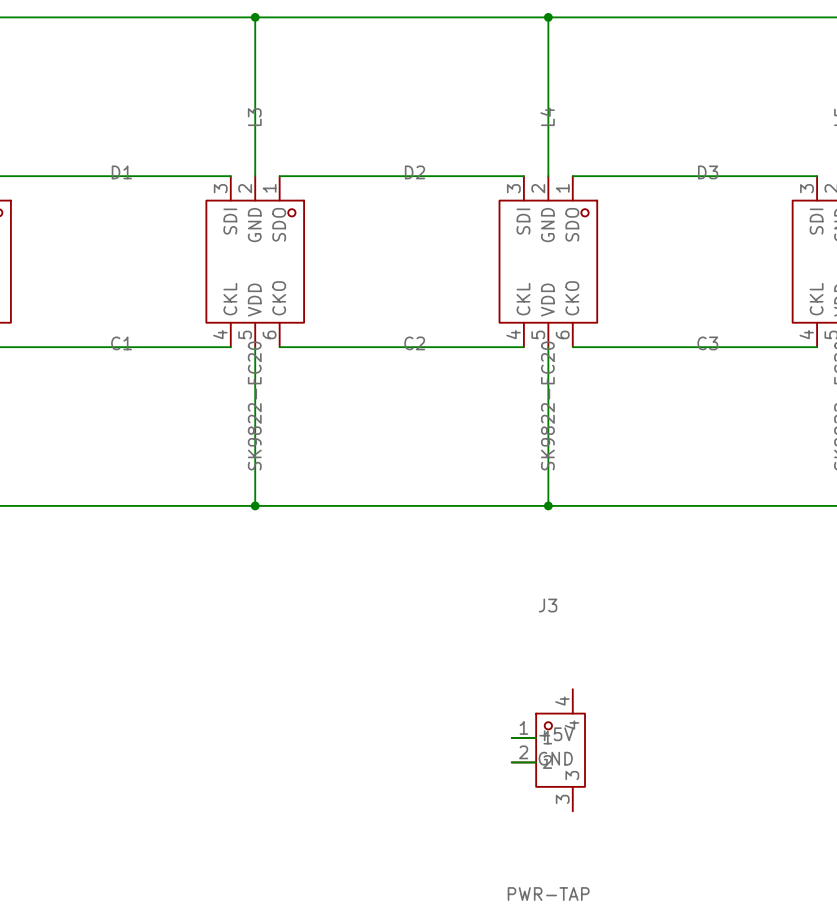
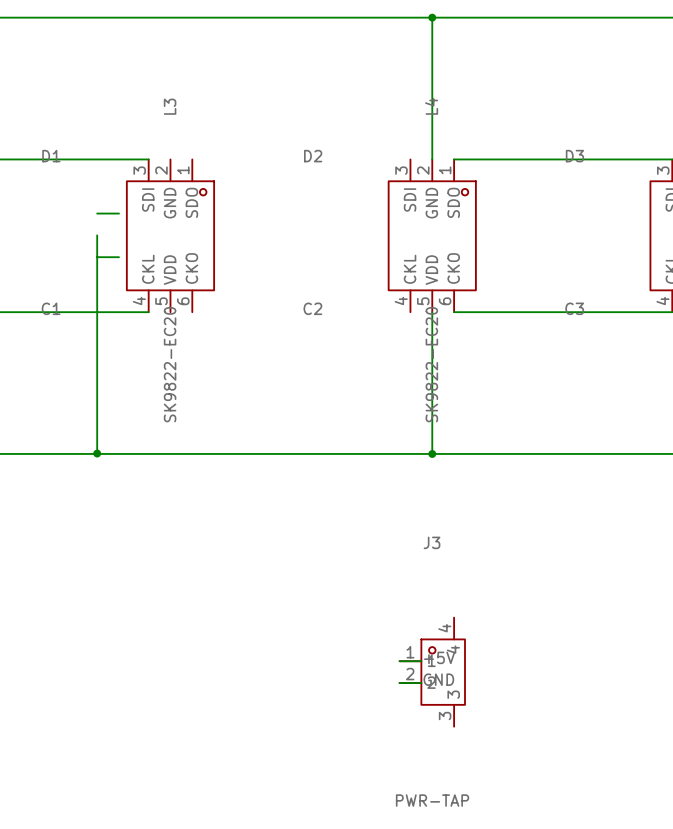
wire: (255, 17) (255, 176) -> none
junction: (255, 17) -> none
wire: (279, 176) (523, 176) -> none
wire: none -> (97, 213) (119, 213)
wire: none -> (97, 235) (97, 453)
wire: none -> (97, 257) (119, 257)
wire: (255, 347) (255, 505) -> none
wire: (279, 347) (523, 347) -> none
junction: none -> (97, 453)
junction: (255, 505) -> none

